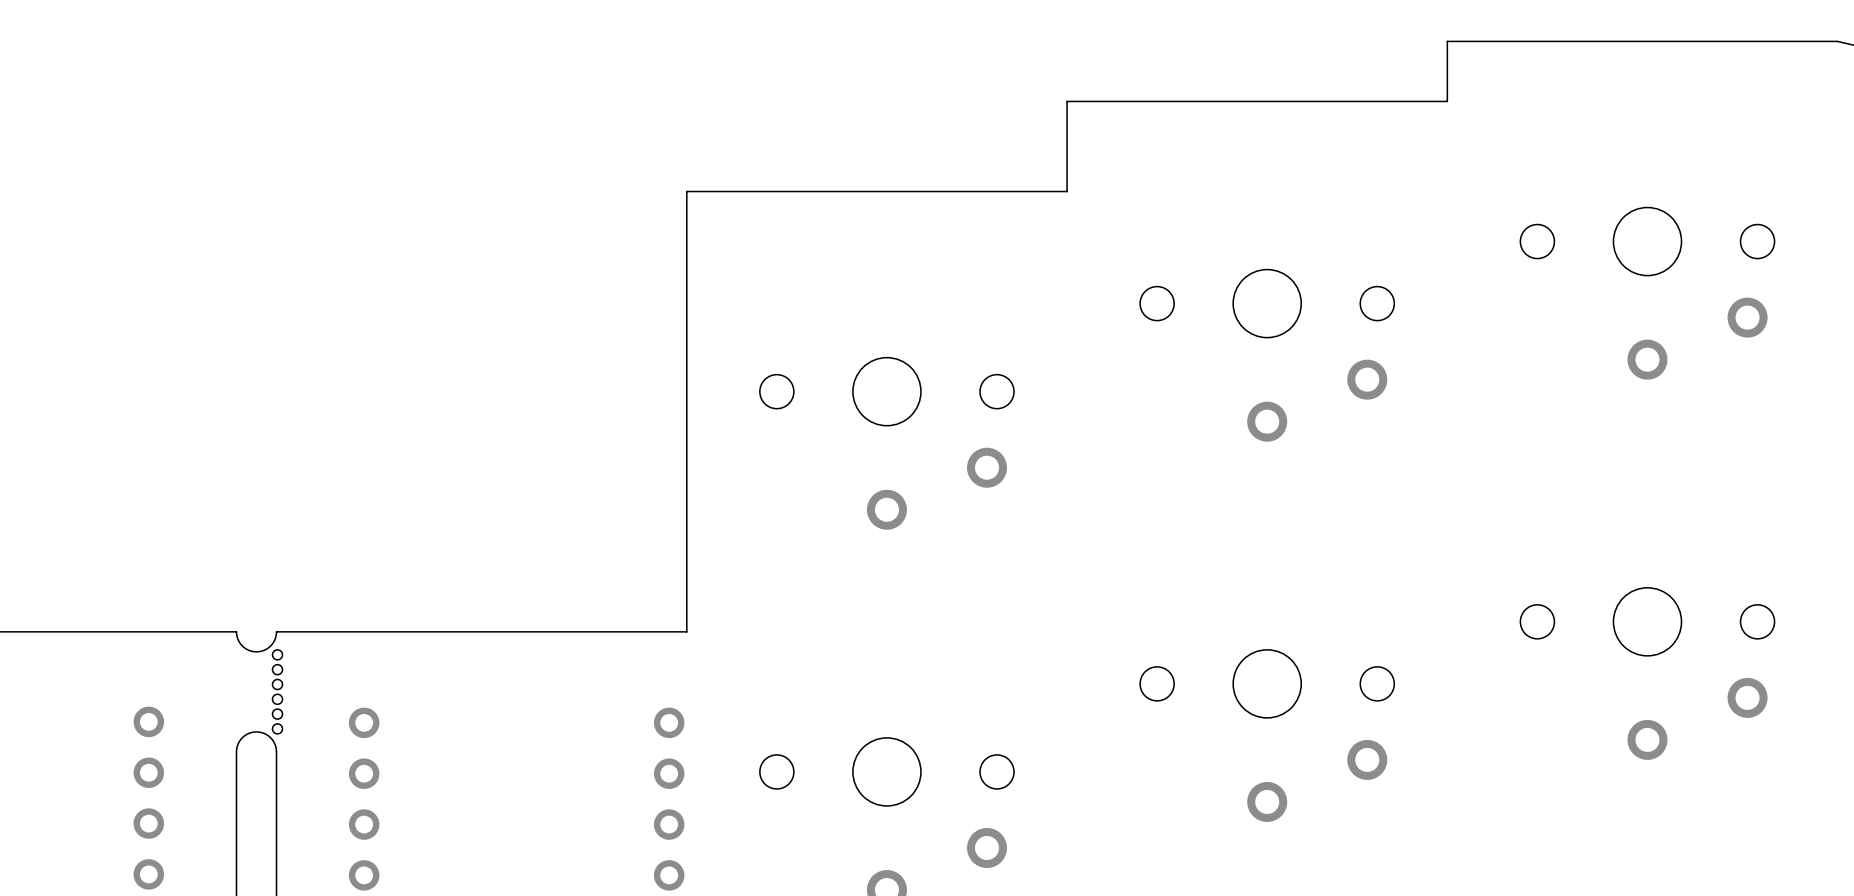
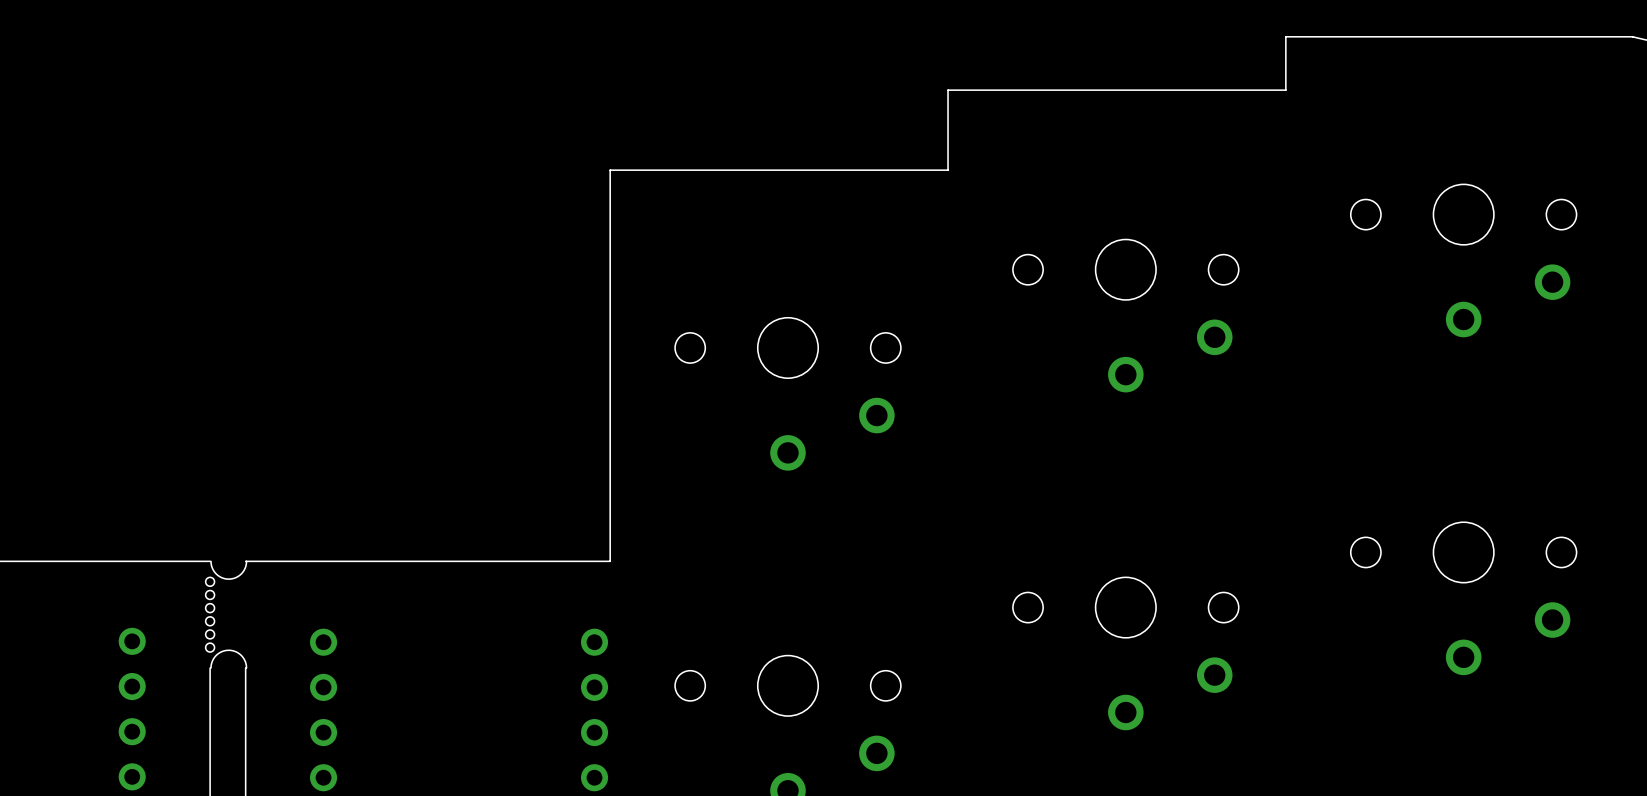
part rotation: 0° (259, 691) -> 180° (226, 614)

